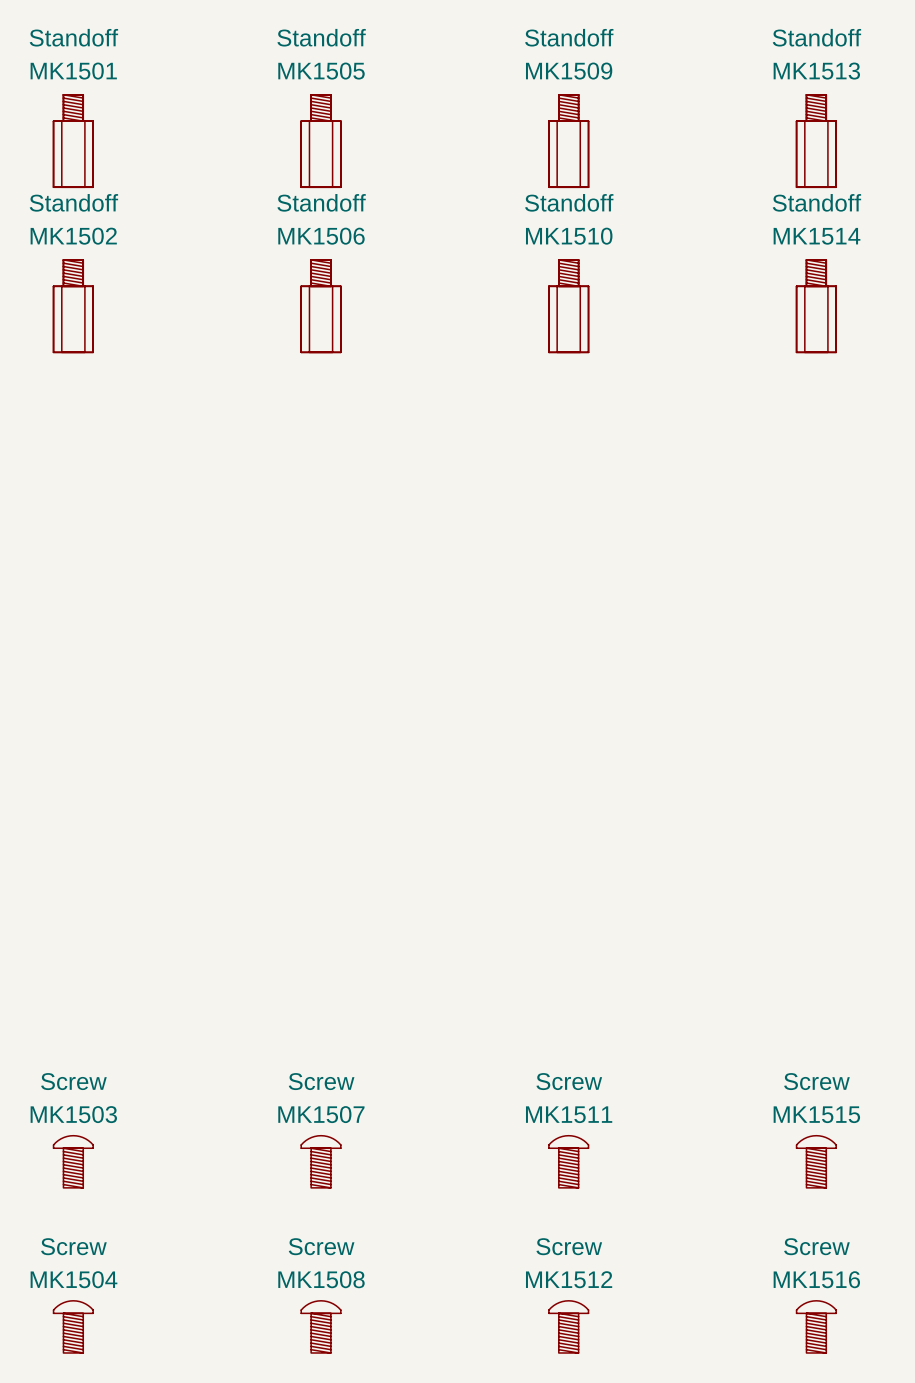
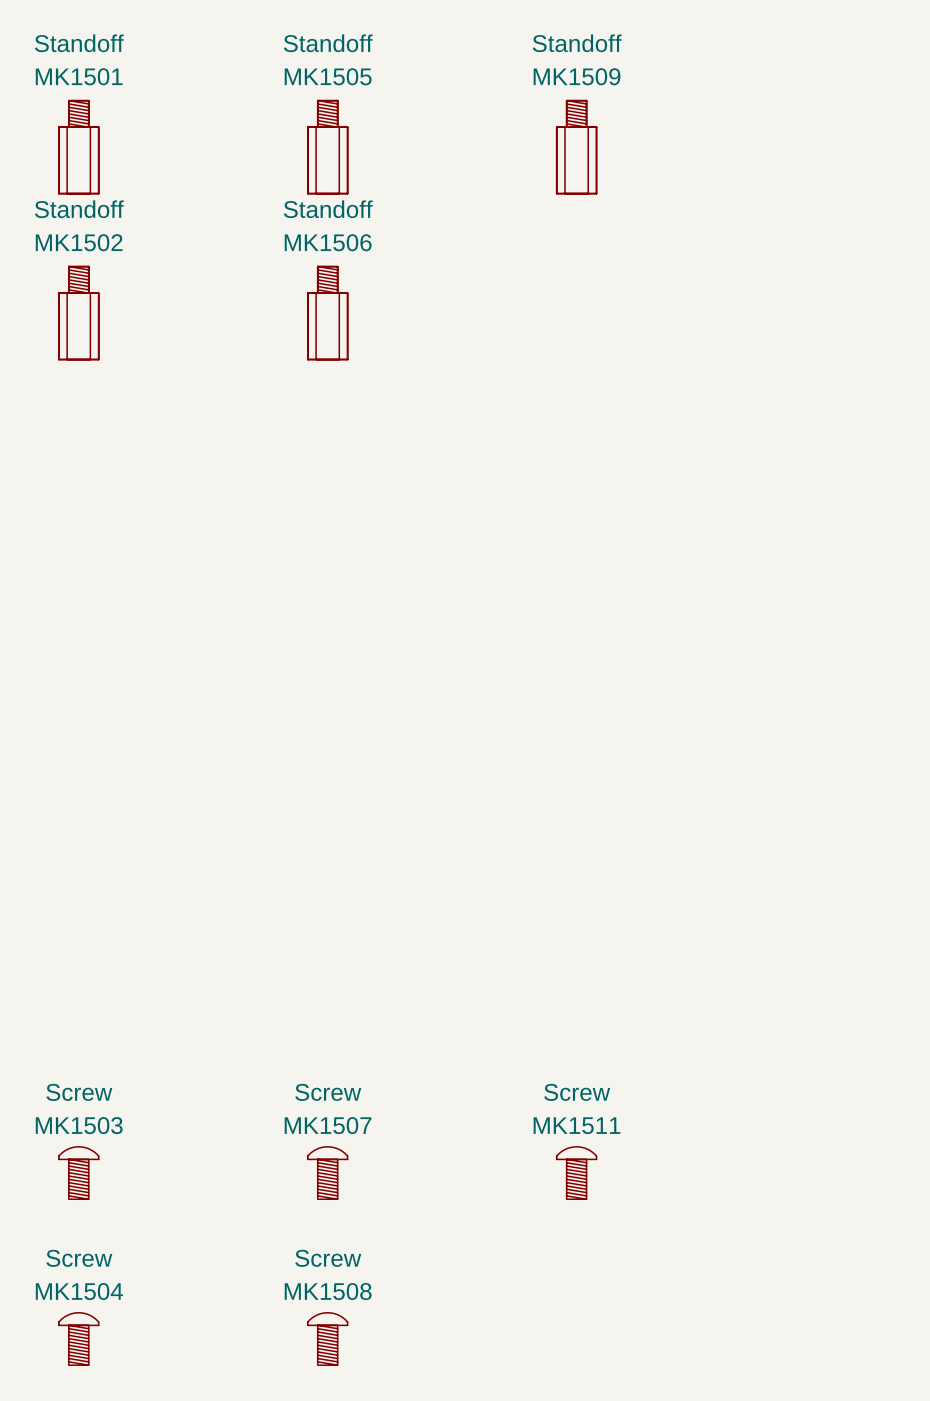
MK1513: Standoff (816, 141) -> none
MK1510: Standoff (568, 306) -> none
MK1514: Standoff (816, 306) -> none
MK1515: Screw (816, 1161) -> none
MK1512: Screw (568, 1326) -> none
MK1516: Screw (816, 1326) -> none

